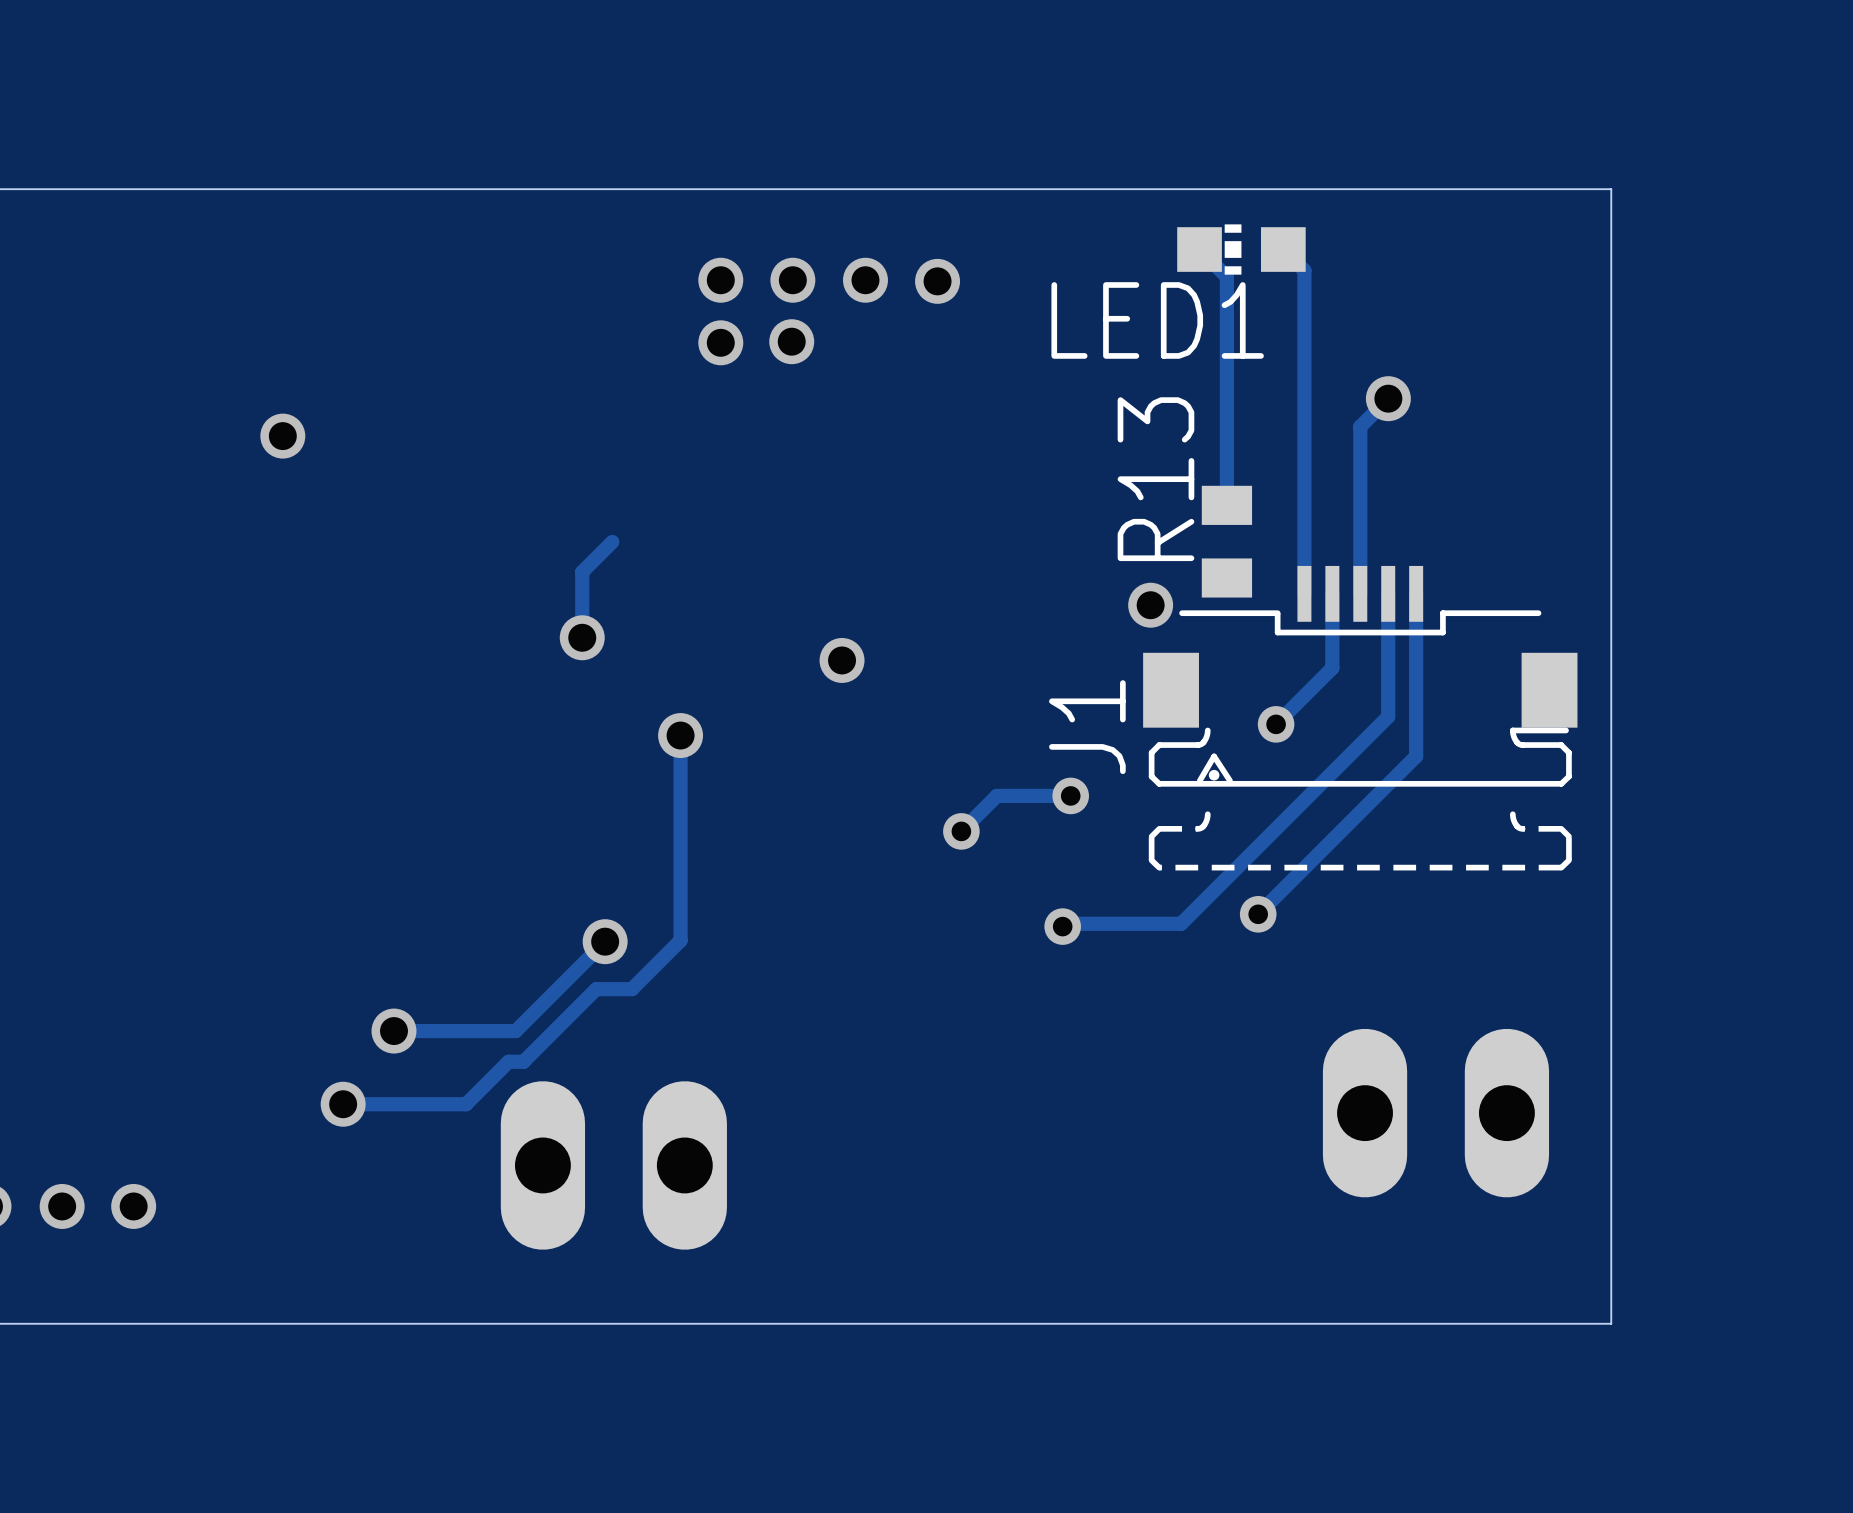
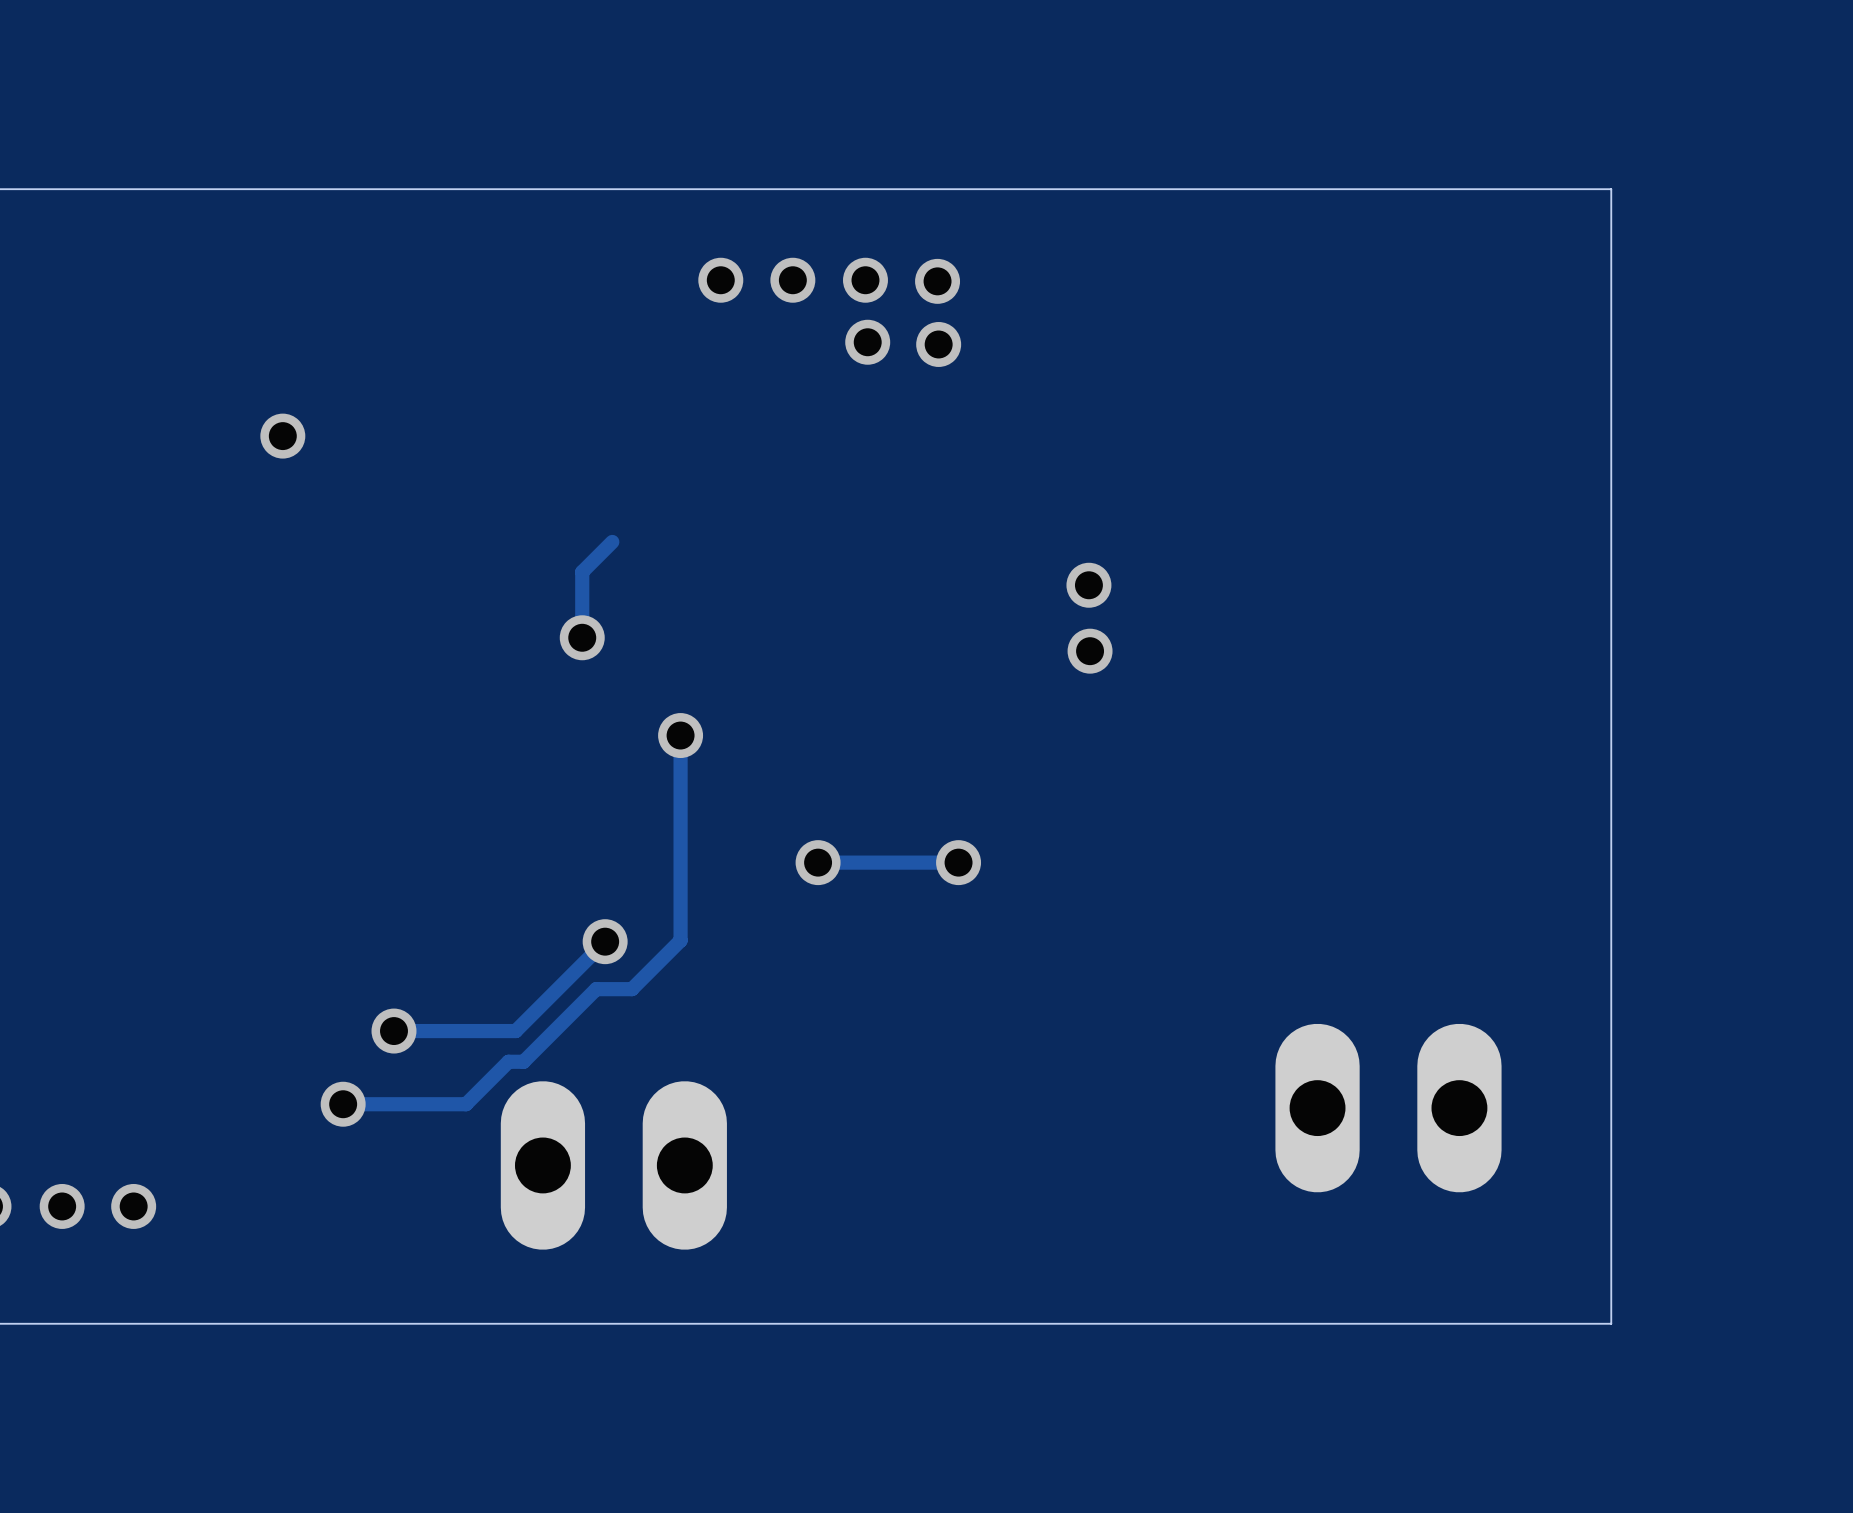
track: (1199, 249) (1226, 276) (1226, 505) -> none
LED1: (1241, 249) -> none
track: (1283, 249) (1304, 270) (1304, 593) -> none
via: (791, 341) -> none
via: (720, 342) -> none
via: none -> (867, 342)
via: none -> (938, 344)
track: (1388, 398) (1360, 426) (1360, 593) -> none
via: (1388, 398) -> none
R13: (1226, 541) -> none
via: none -> (1088, 585)
track: (1332, 593) (1332, 668) (1276, 724) -> none
track: (1388, 593) (1388, 716) (1181, 923) (1065, 923) (1062, 926) -> none
track: (1416, 593) (1416, 756) (1258, 914) -> none
via: (1150, 605) -> none
via: none -> (1090, 651)
via: (842, 660) -> none
J1: (1360, 718) -> none
via: (1276, 724) -> none
track: (1070, 795) (996, 795) (961, 831) -> none
via: (1070, 795) -> none
via position: (961, 831) -> (958, 862)
via: none -> (818, 862)
track: none -> (958, 862) (818, 862)
via: (1258, 914) -> none
via: (1062, 926) -> none
part position: (1435, 1113) -> (1388, 1108)

